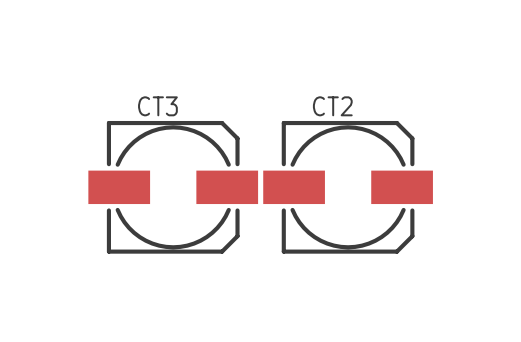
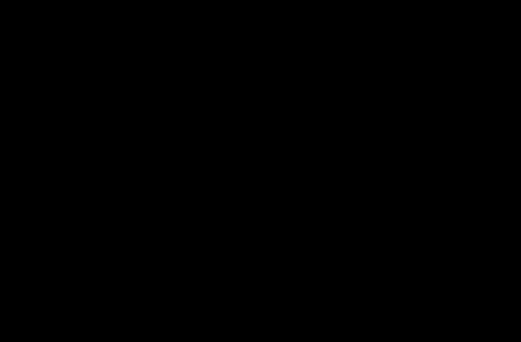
CT3: (173, 187) -> none
CT2: (348, 187) -> none

